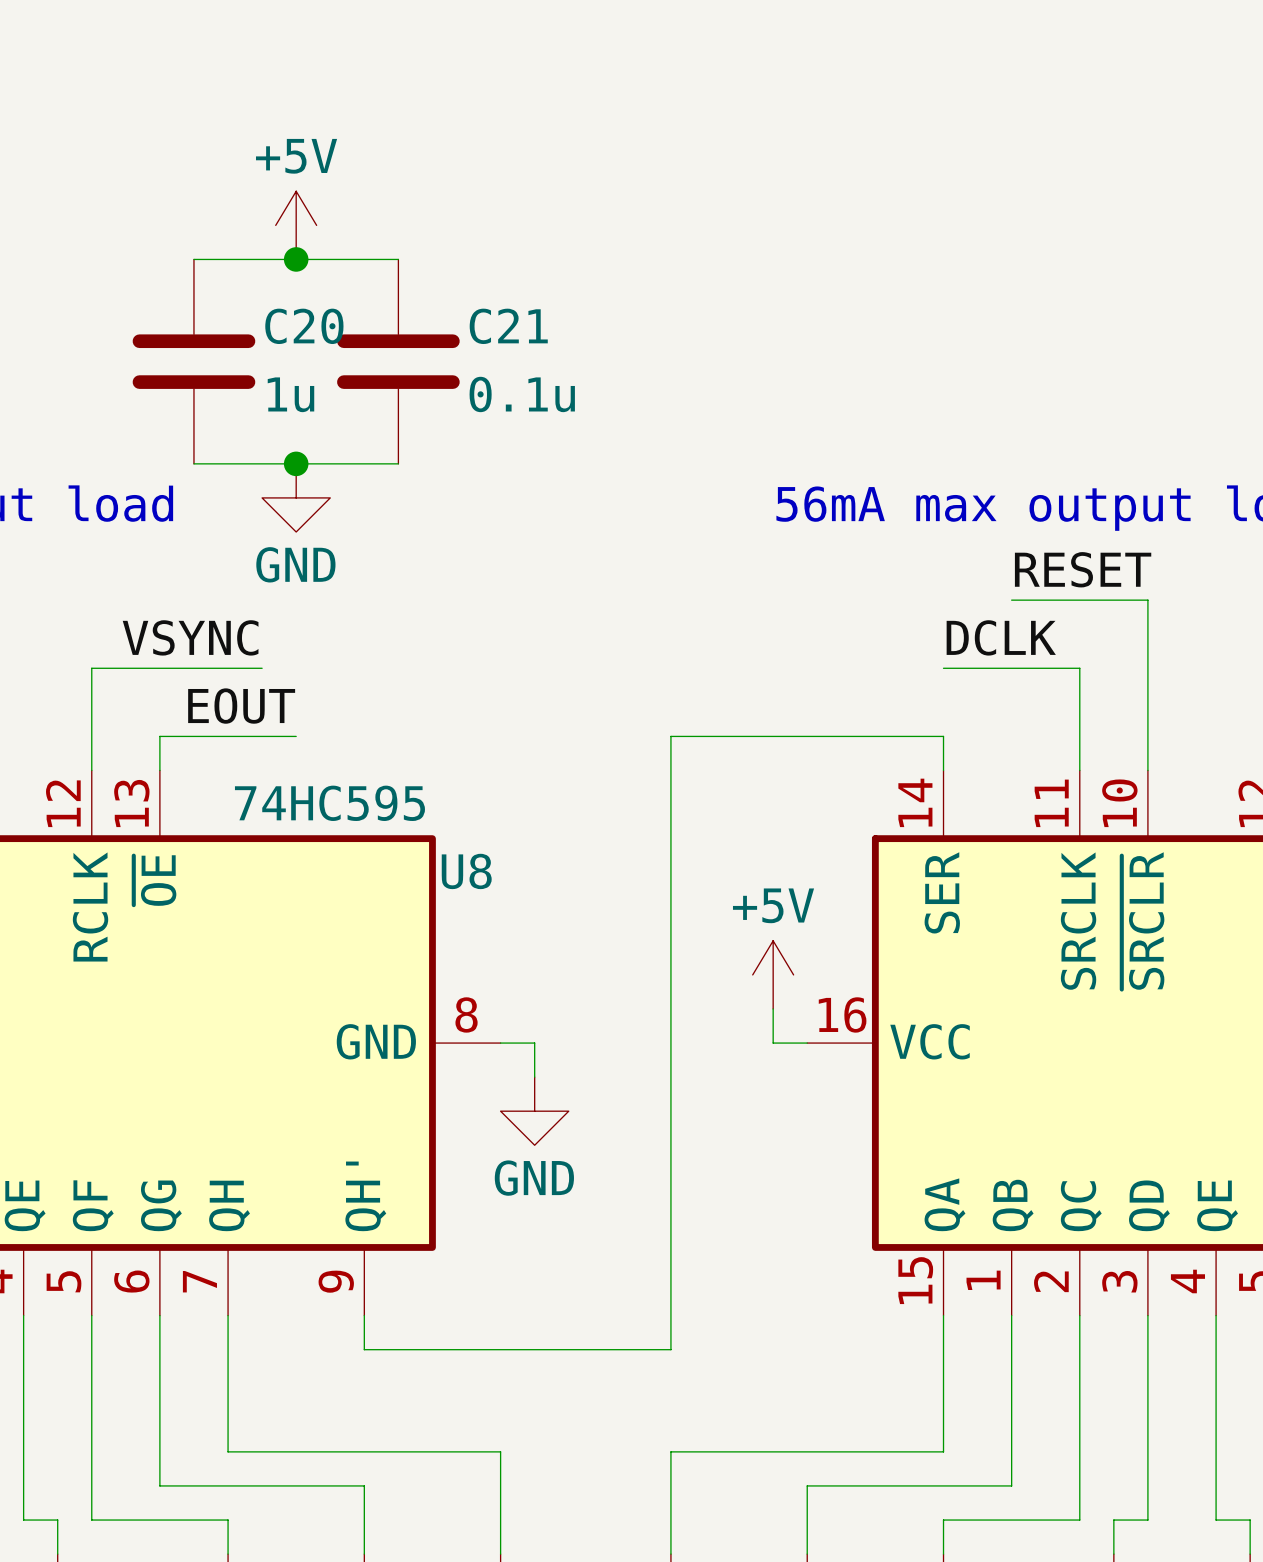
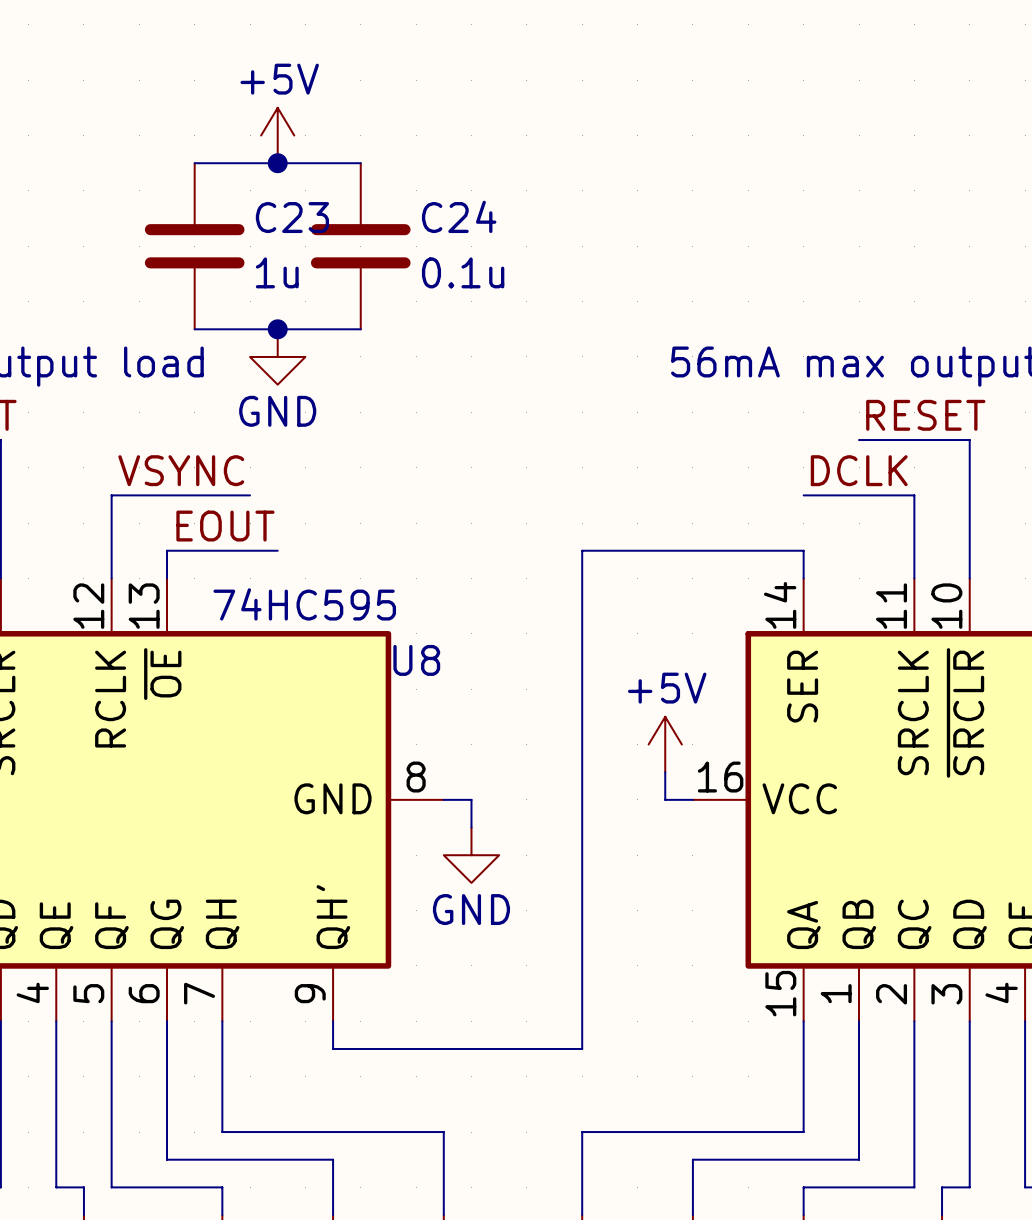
C20 name: C20 (304, 326) -> C23 (292, 217)
C21 name: C21 (508, 326) -> C24 (459, 216)

